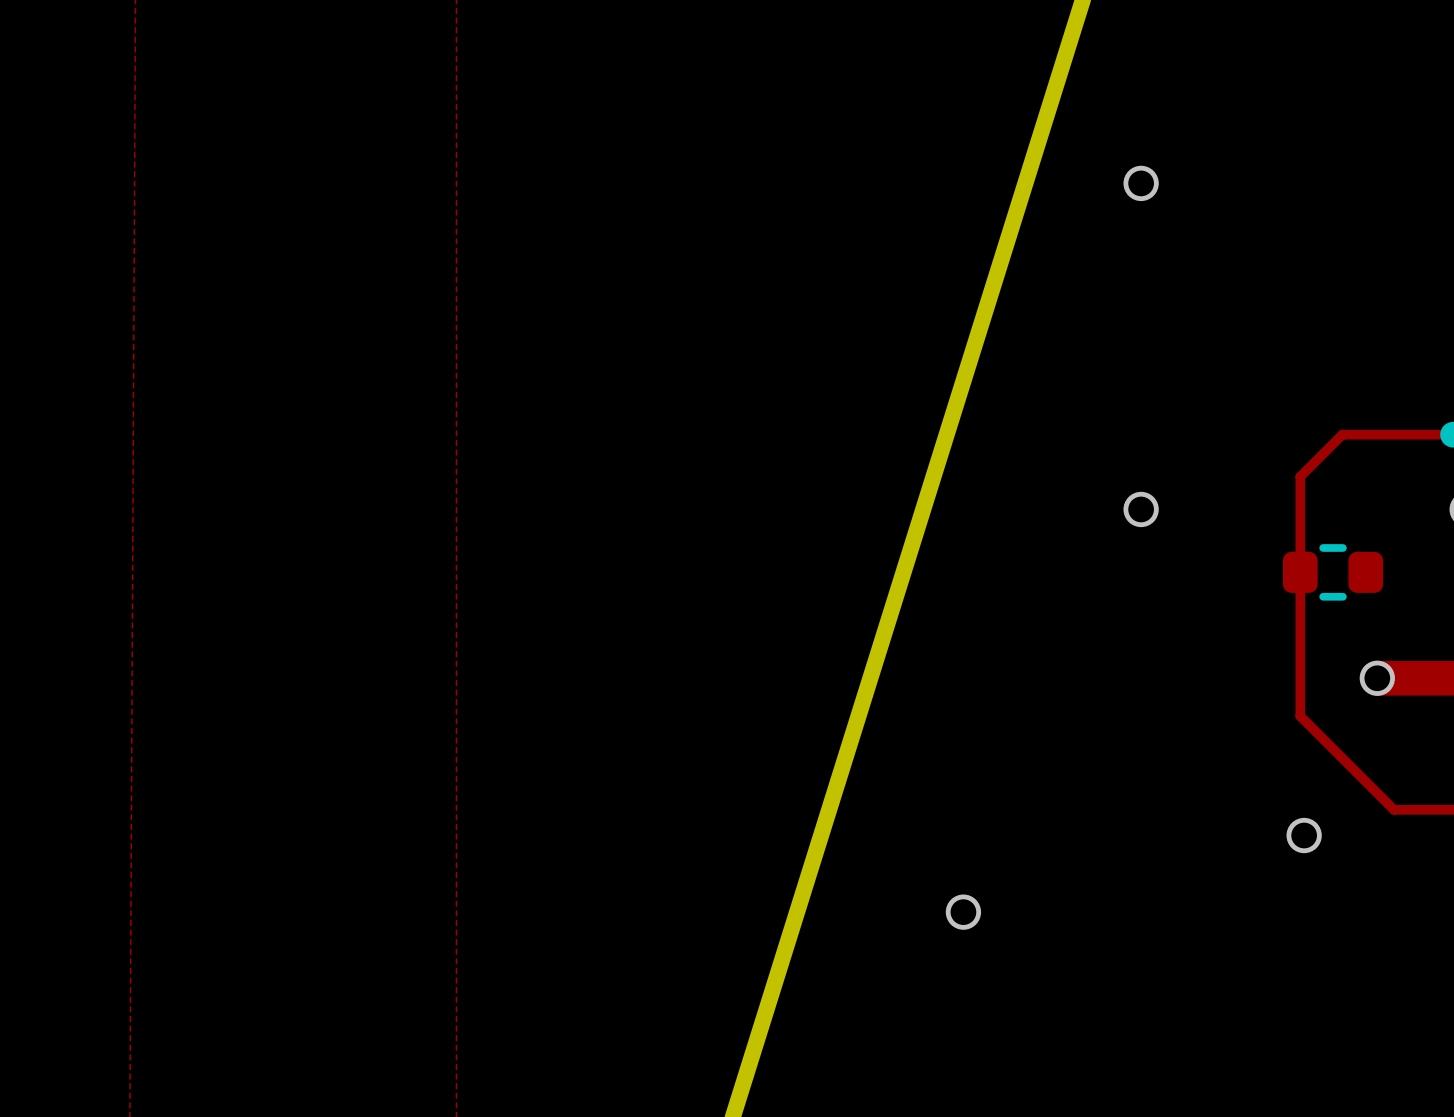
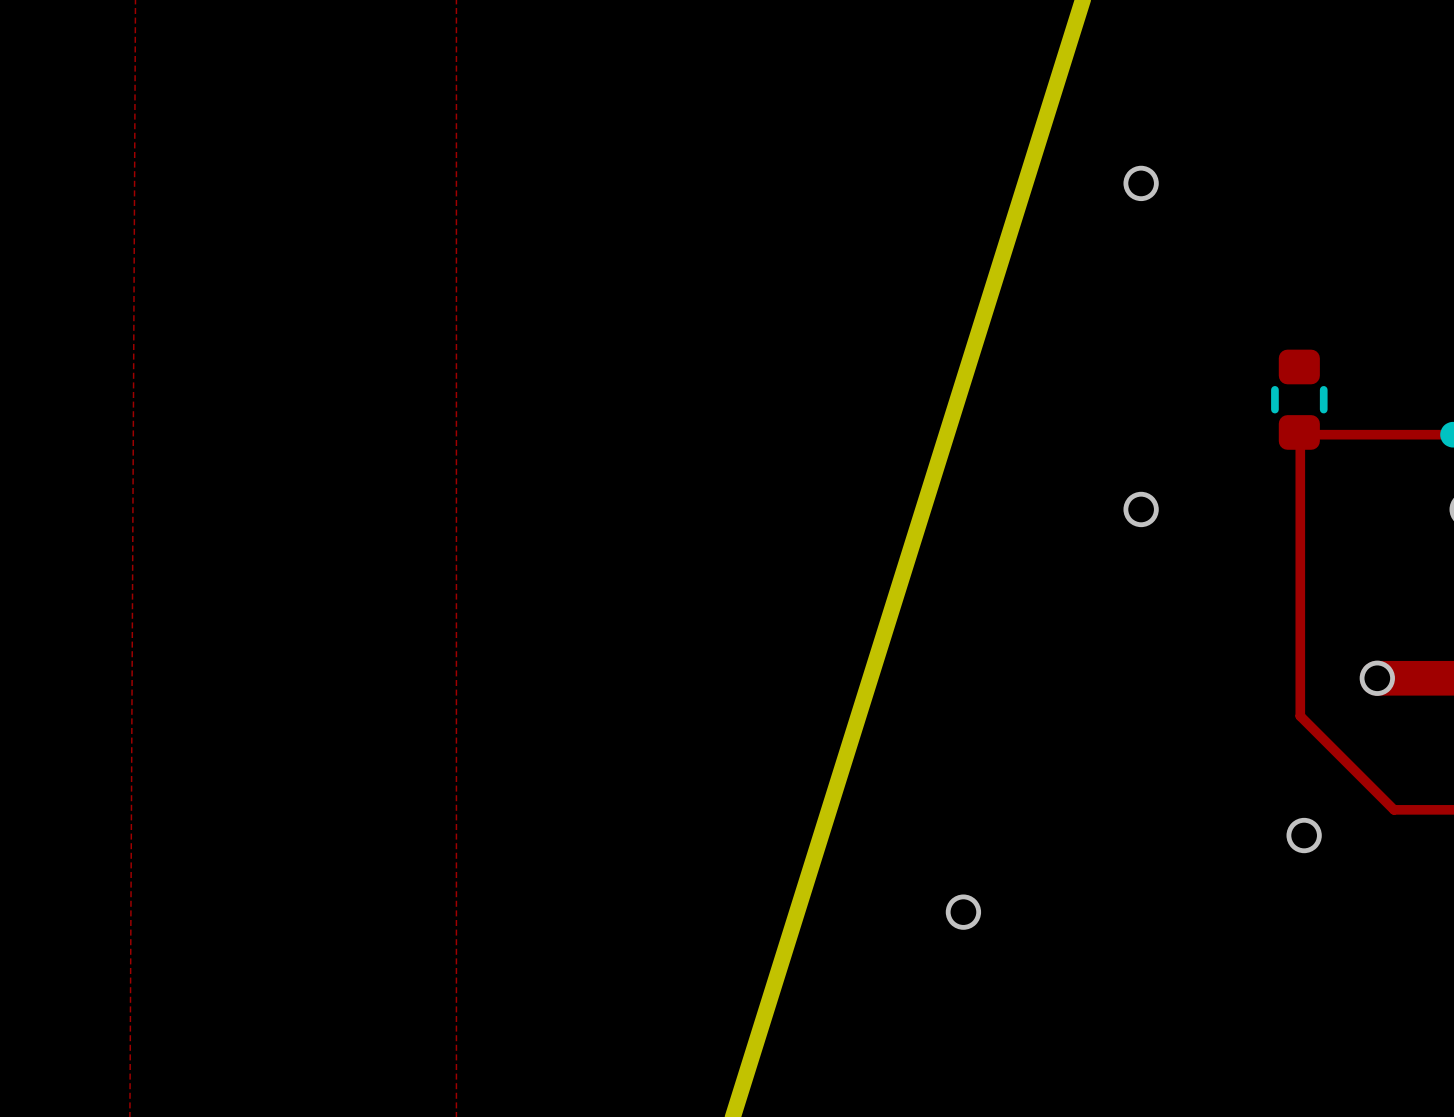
track: (1342, 434) (1300, 476) -> (1342, 434) (1301, 434)
track: none -> (1299, 437) (1300, 476)
part rotation: 0° (1333, 572) -> 90° clockwise (1299, 399)
part position: (1333, 572) -> (1299, 399)

